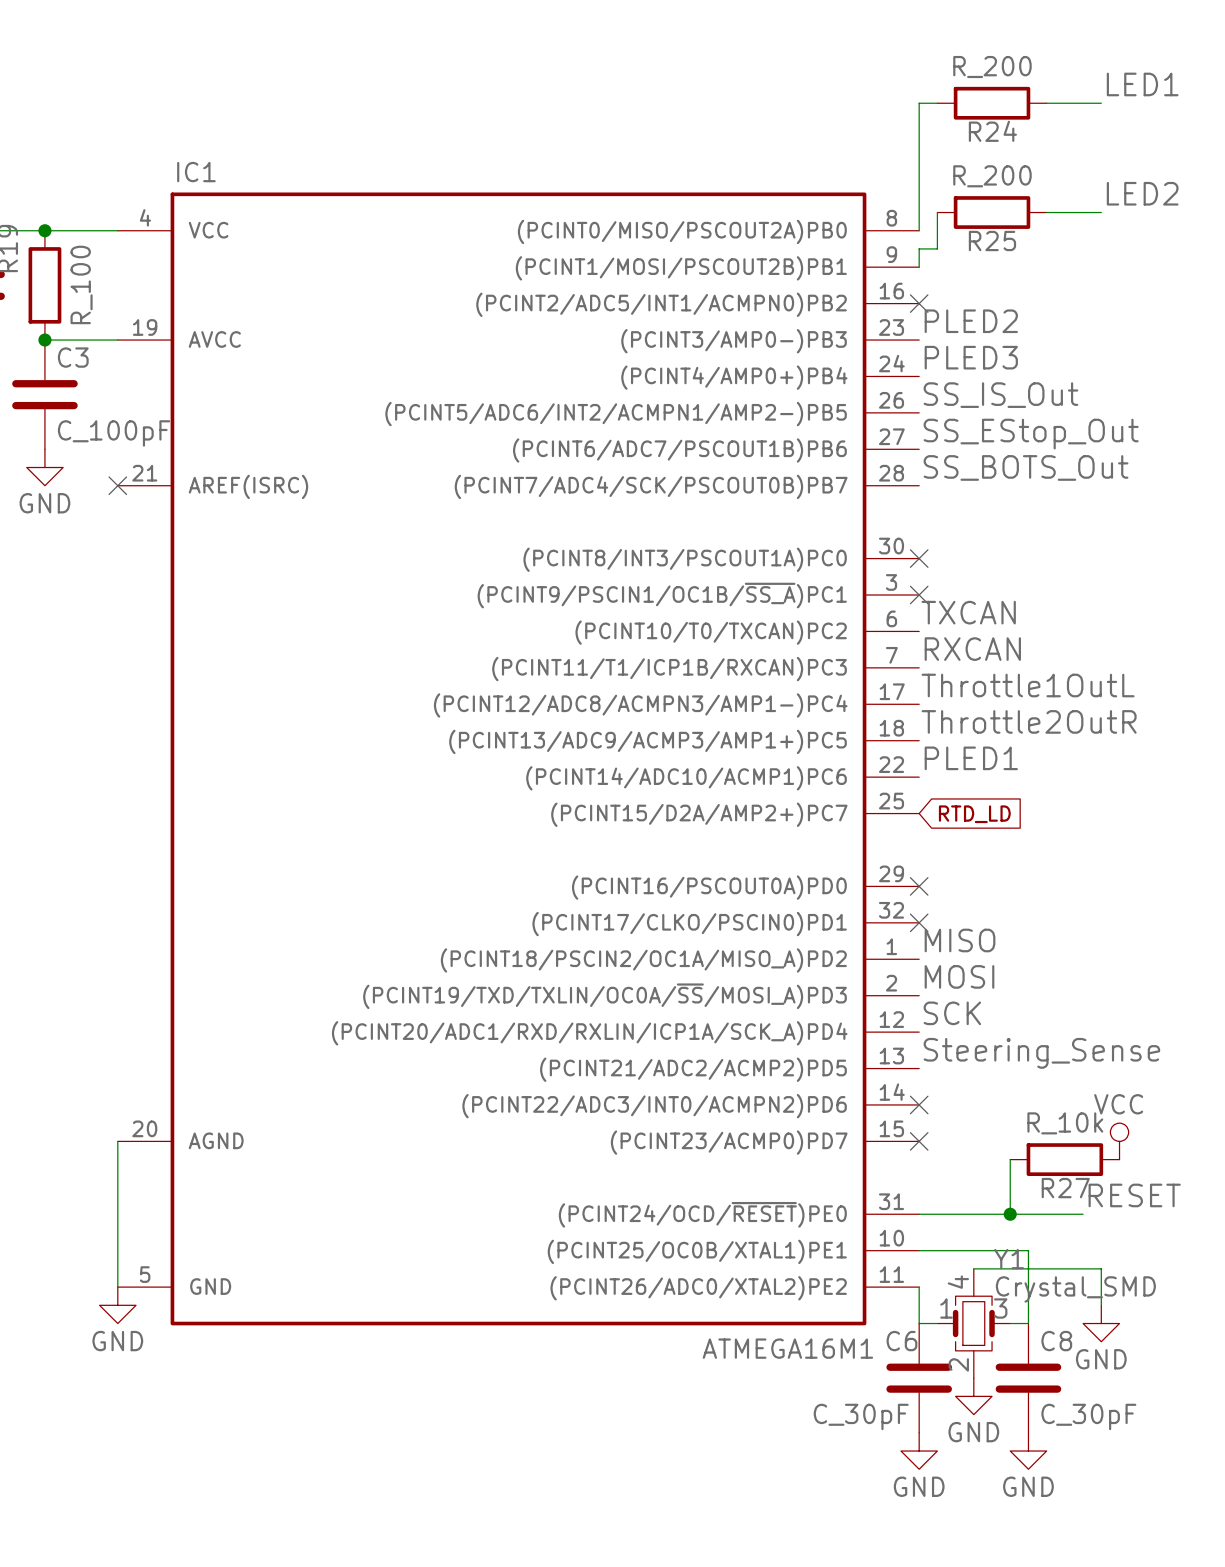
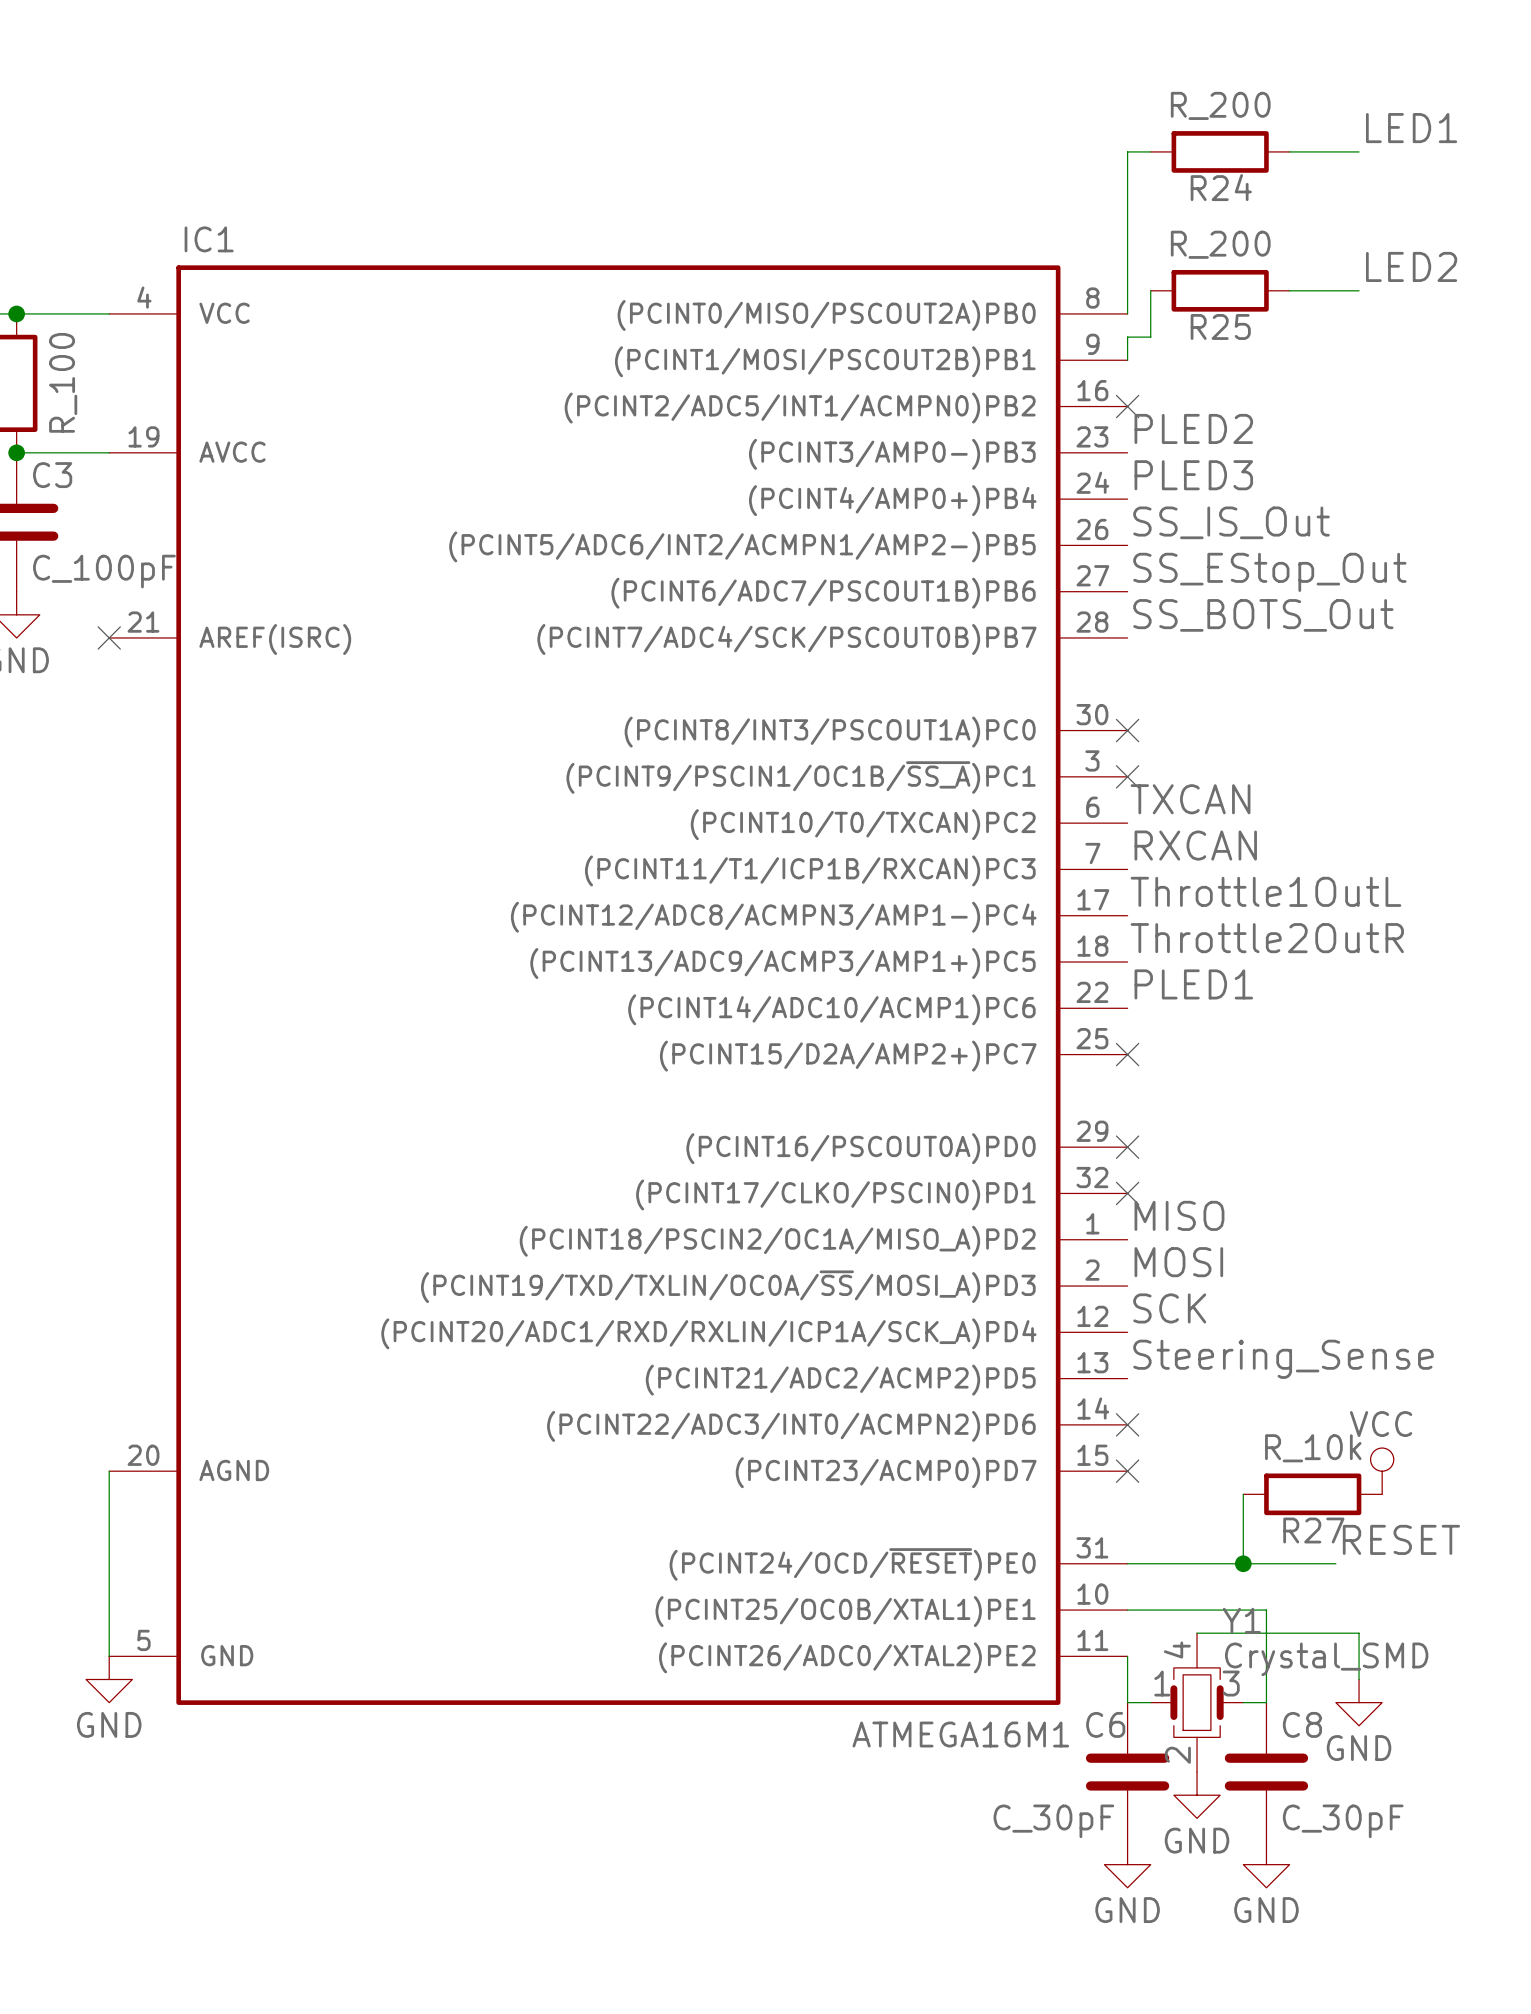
no-connect mark: none -> (1127, 1054)
global label: RTD_LD (974, 814) -> none

